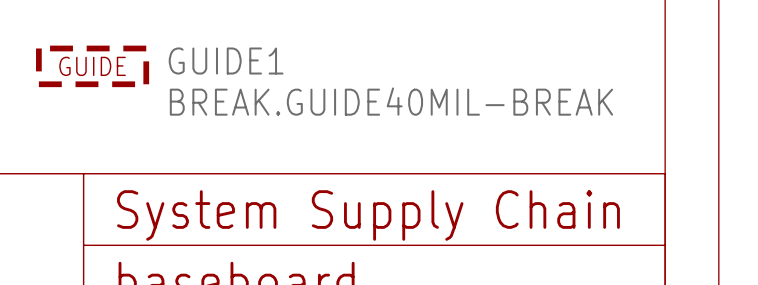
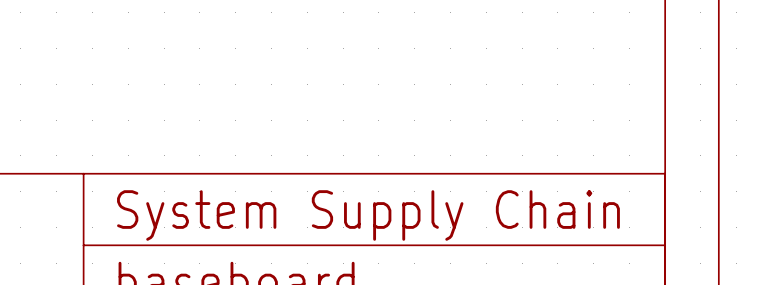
GUIDE1: BREAK.GUIDE40MIL-BREAK (92, 66) -> none

